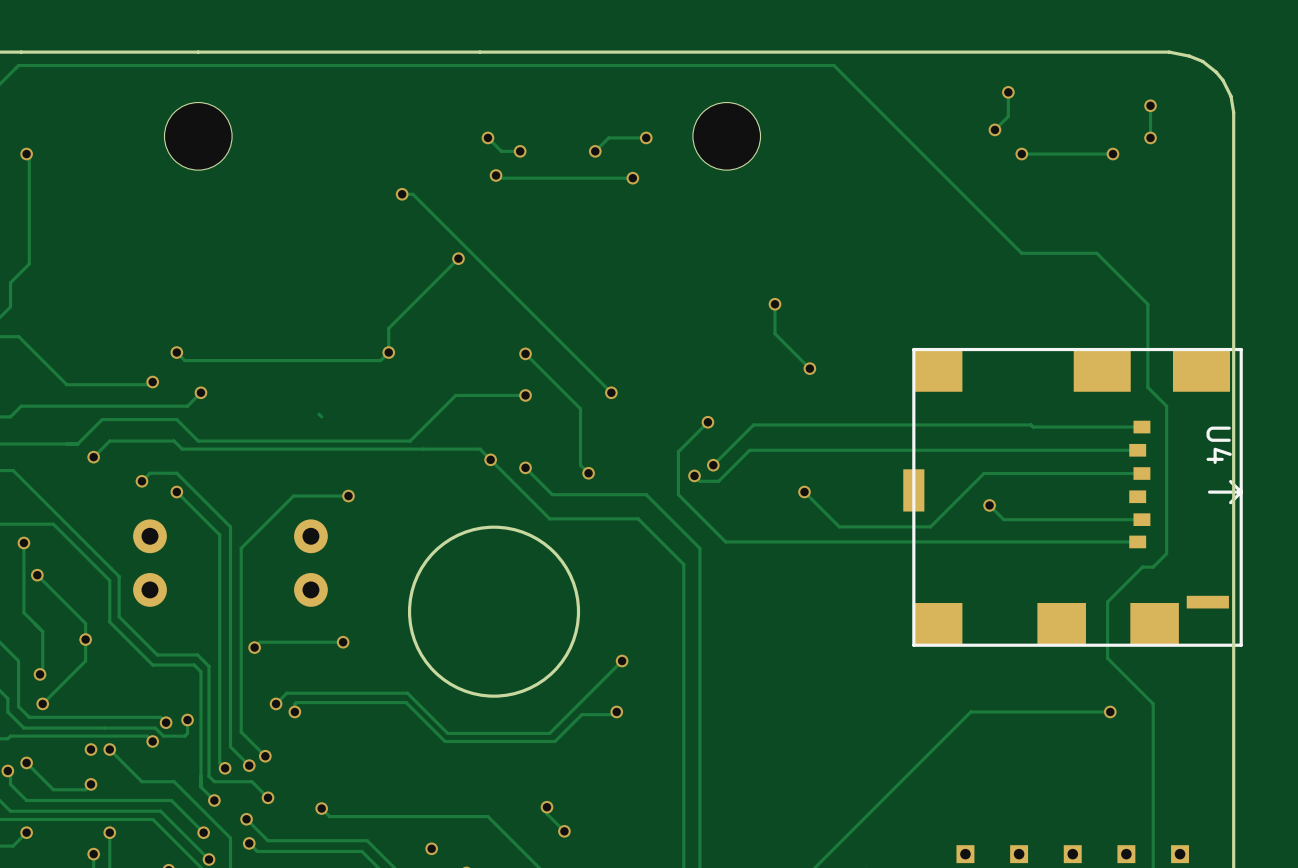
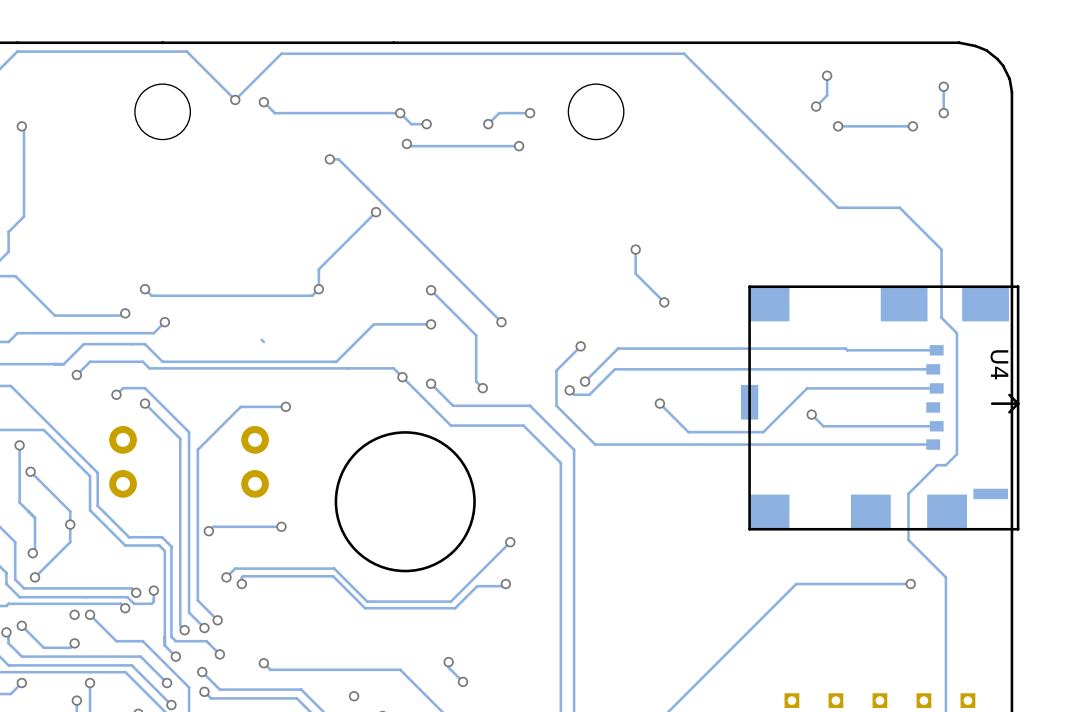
track: (343, 65) (18, 65) -> (281, 53) (235, 99) (186, 51) (17, 51) (15, 53)
via: none -> (235, 99)
track: none -> (263, 102) (274, 113) (400, 113)
via: none -> (263, 102)

